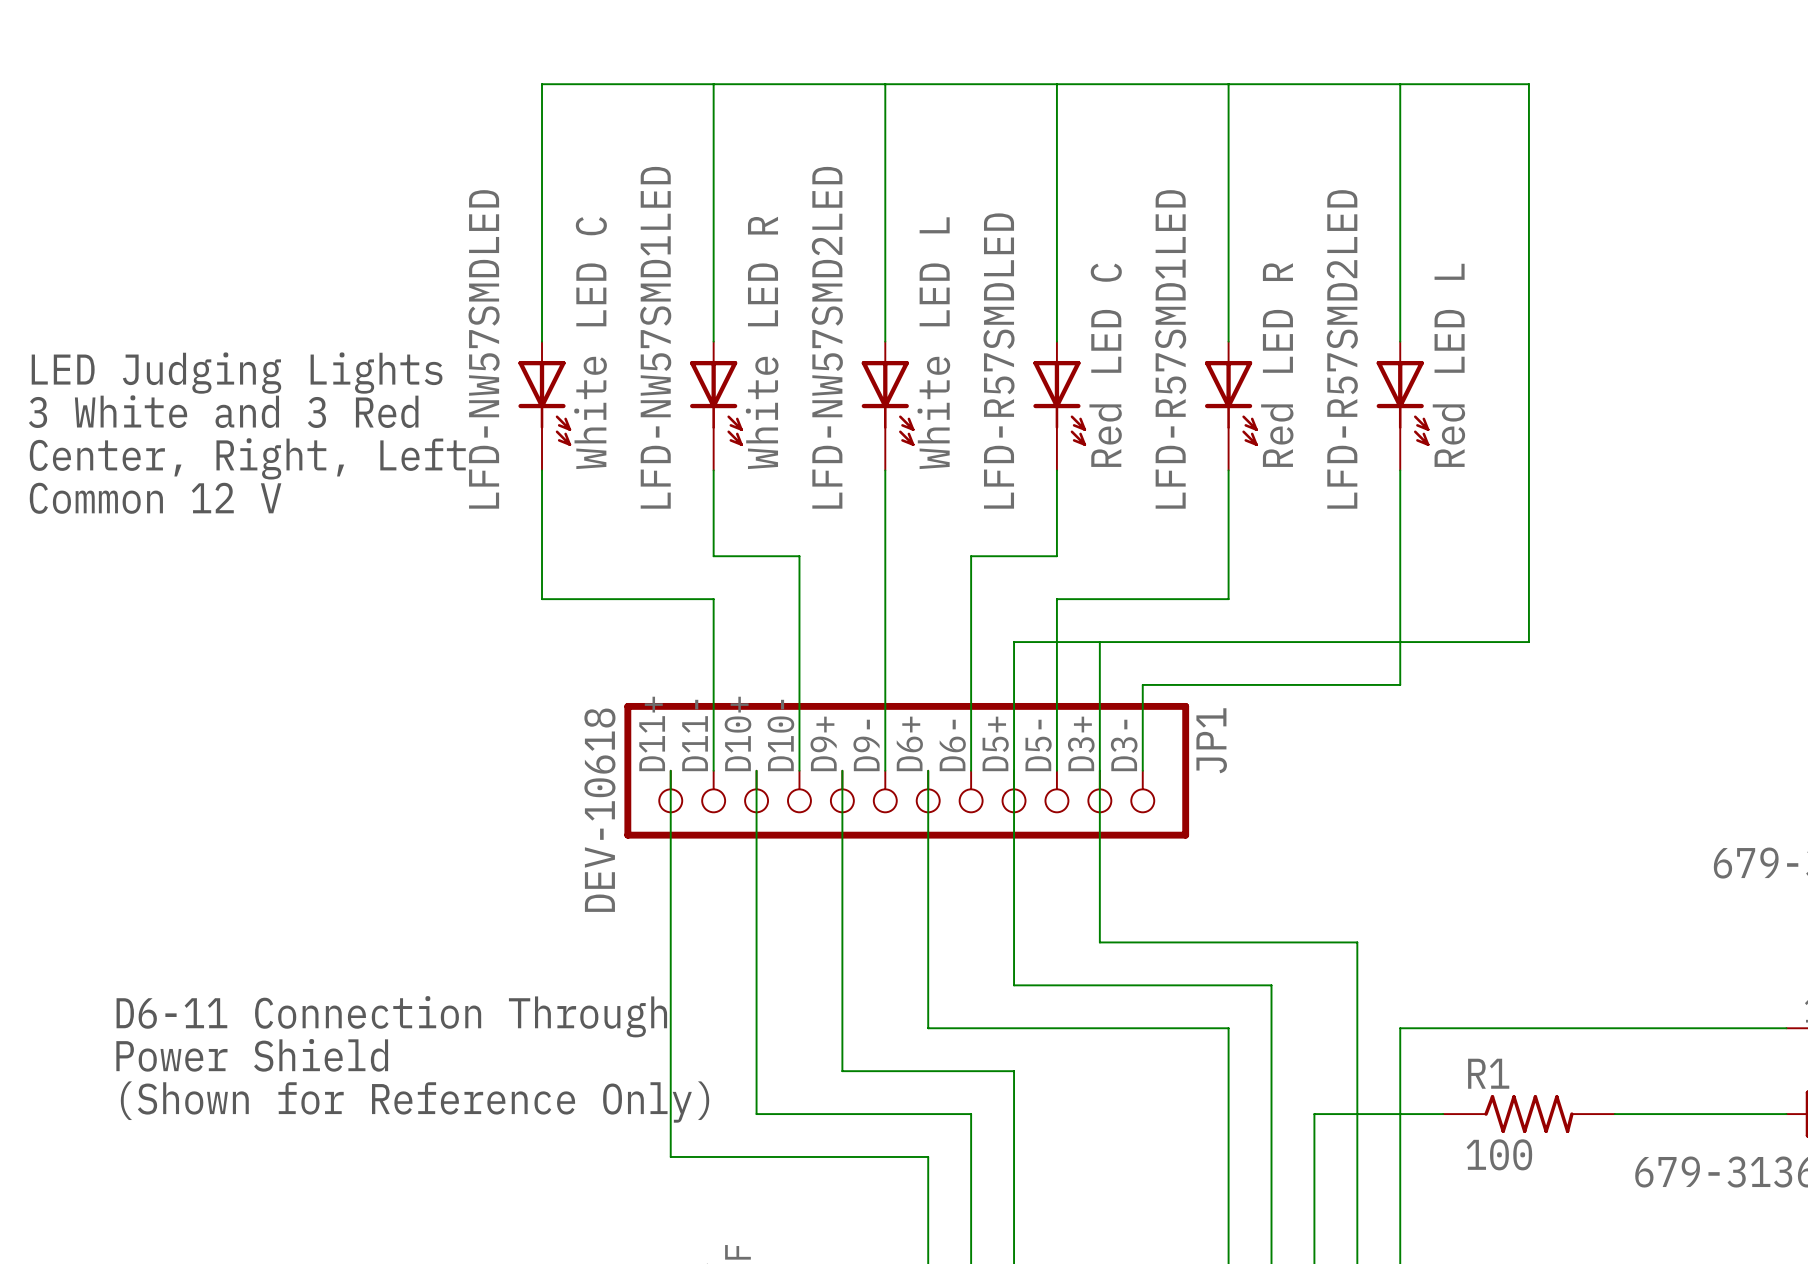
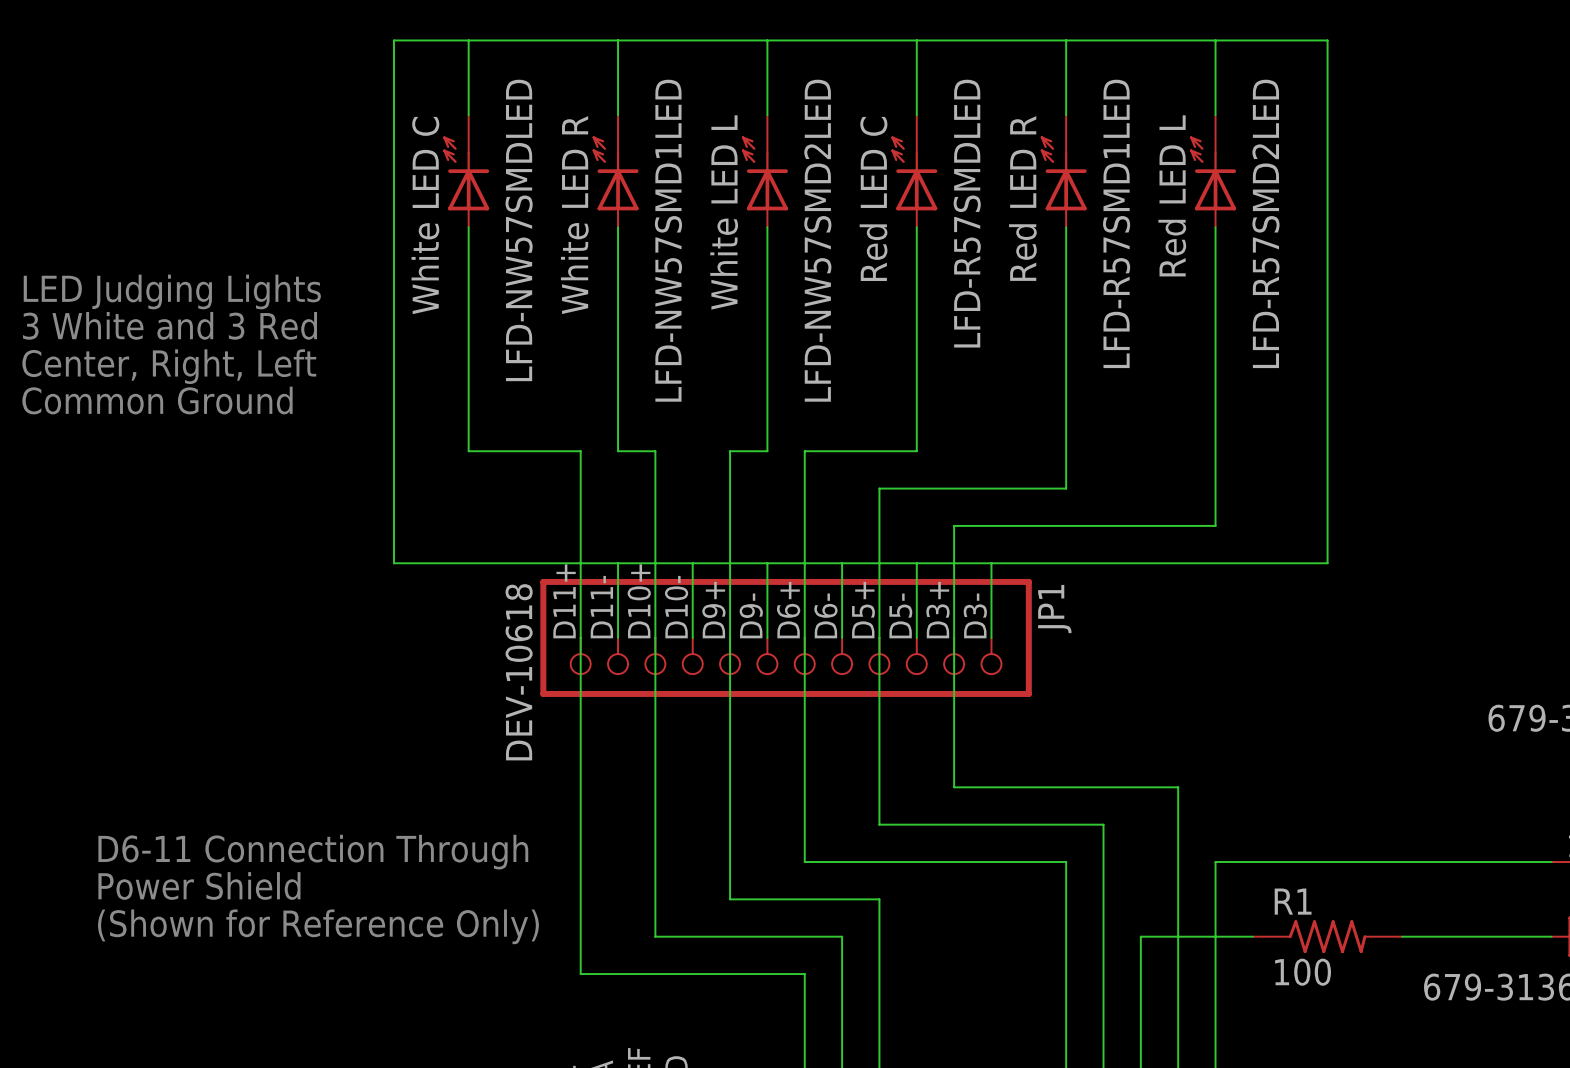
wire: none -> (468, 40) (393, 40) (393, 563) (991, 563)
LFD-NW57SMDLED rotation: 0° (544, 403) -> 180° (466, 173)
LFD-NW57SMD1LED rotation: 0° (716, 403) -> 180° (615, 173)
LFD-NW57SMD2LED rotation: 0° (888, 403) -> 180° (764, 173)
LFD-R57SMDLED rotation: 0° (1059, 403) -> 180° (914, 173)
LFD-R57SMD1LED rotation: 0° (1231, 403) -> 180° (1063, 173)
LFD-R57SMD2LED rotation: 0° (1403, 403) -> 180° (1213, 173)
LFD-NW57SMDLED position: (544, 406) -> (466, 171)
LFD-NW57SMD1LED position: (716, 406) -> (615, 171)
LFD-NW57SMD2LED position: (888, 406) -> (764, 171)
LFD-R57SMDLED position: (1059, 406) -> (914, 171)
LFD-R57SMD1LED position: (1231, 406) -> (1063, 171)
LFD-R57SMD2LED position: (1403, 406) -> (1213, 171)
text: Common 12 V (155, 498) -> Common Ground (157, 400)
wire: (542, 556) (542, 599) (713, 599) (713, 684) -> (468, 451) (580, 451) (580, 637)
wire: (756, 556) (799, 556) (799, 684) -> (655, 451) (655, 637)
wire: (885, 556) (885, 684) -> (767, 451) (730, 451) (730, 637)
wire: (971, 556) (971, 684) -> (842, 451) (804, 451) (804, 637)
wire: (1056, 599) (1056, 684) -> none
wire: (1014, 642) (1099, 642) -> (879, 525) (879, 488) (916, 488)
wire: (1528, 642) (1400, 642) (1400, 684) -> (1327, 525) (1327, 563) (1215, 563)

